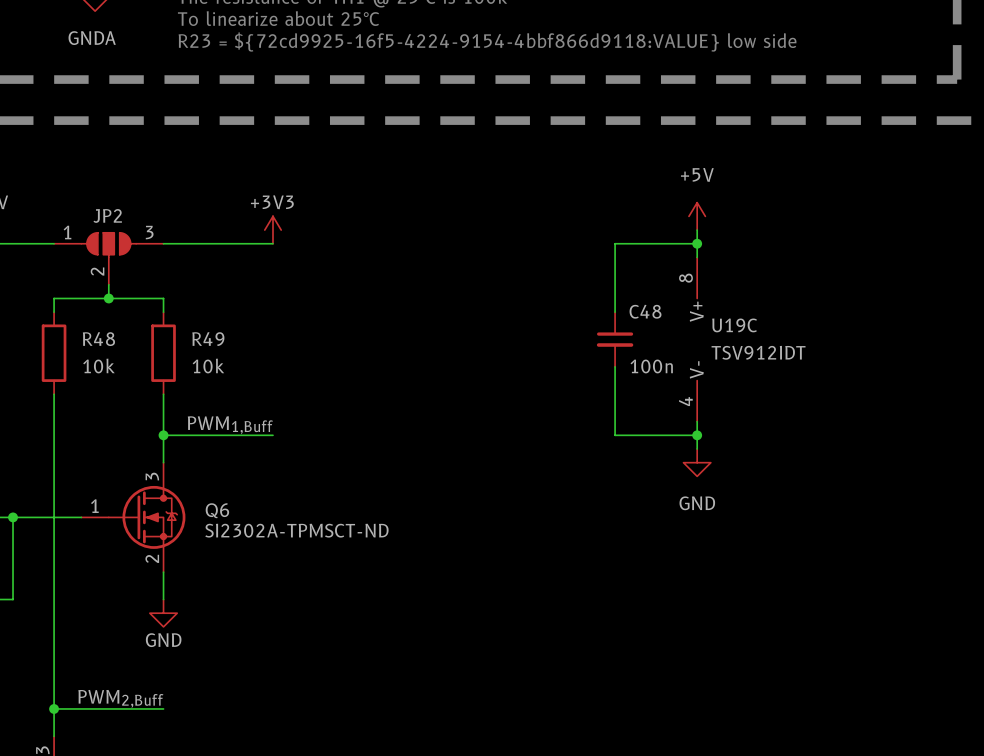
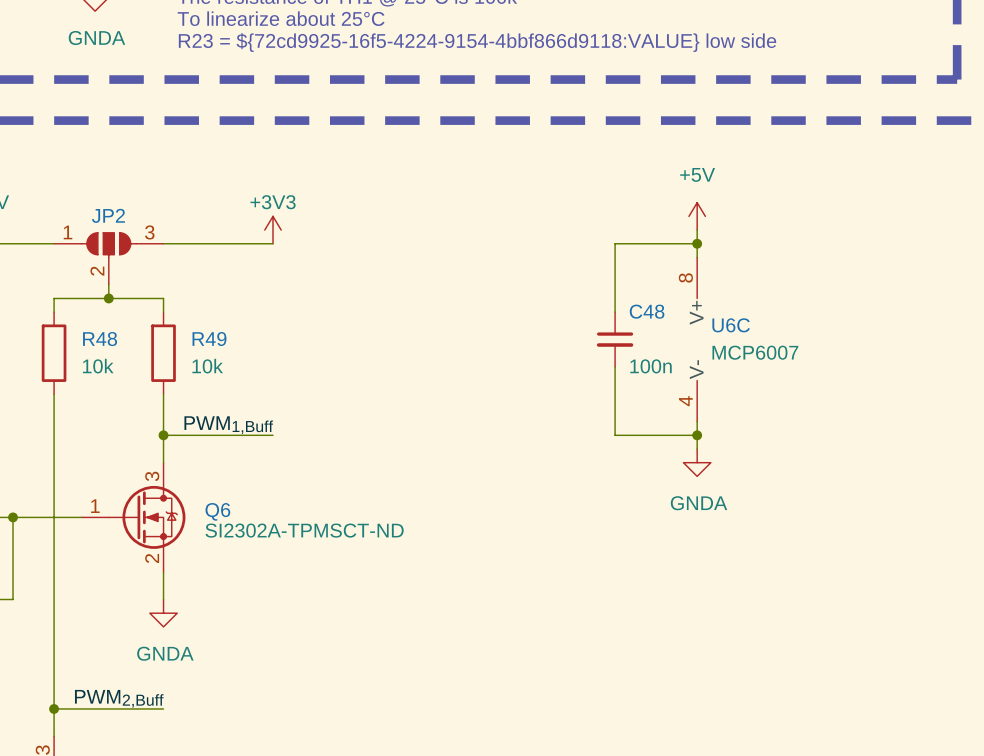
U19C name: U19C (734, 325) -> U6C (731, 325)
U19C value: TSV912IDT (758, 352) -> MCP6007 (755, 352)
power symbol: GND (697, 462) -> GNDA (697, 462)
power symbol: GND (163, 613) -> GNDA (163, 613)

